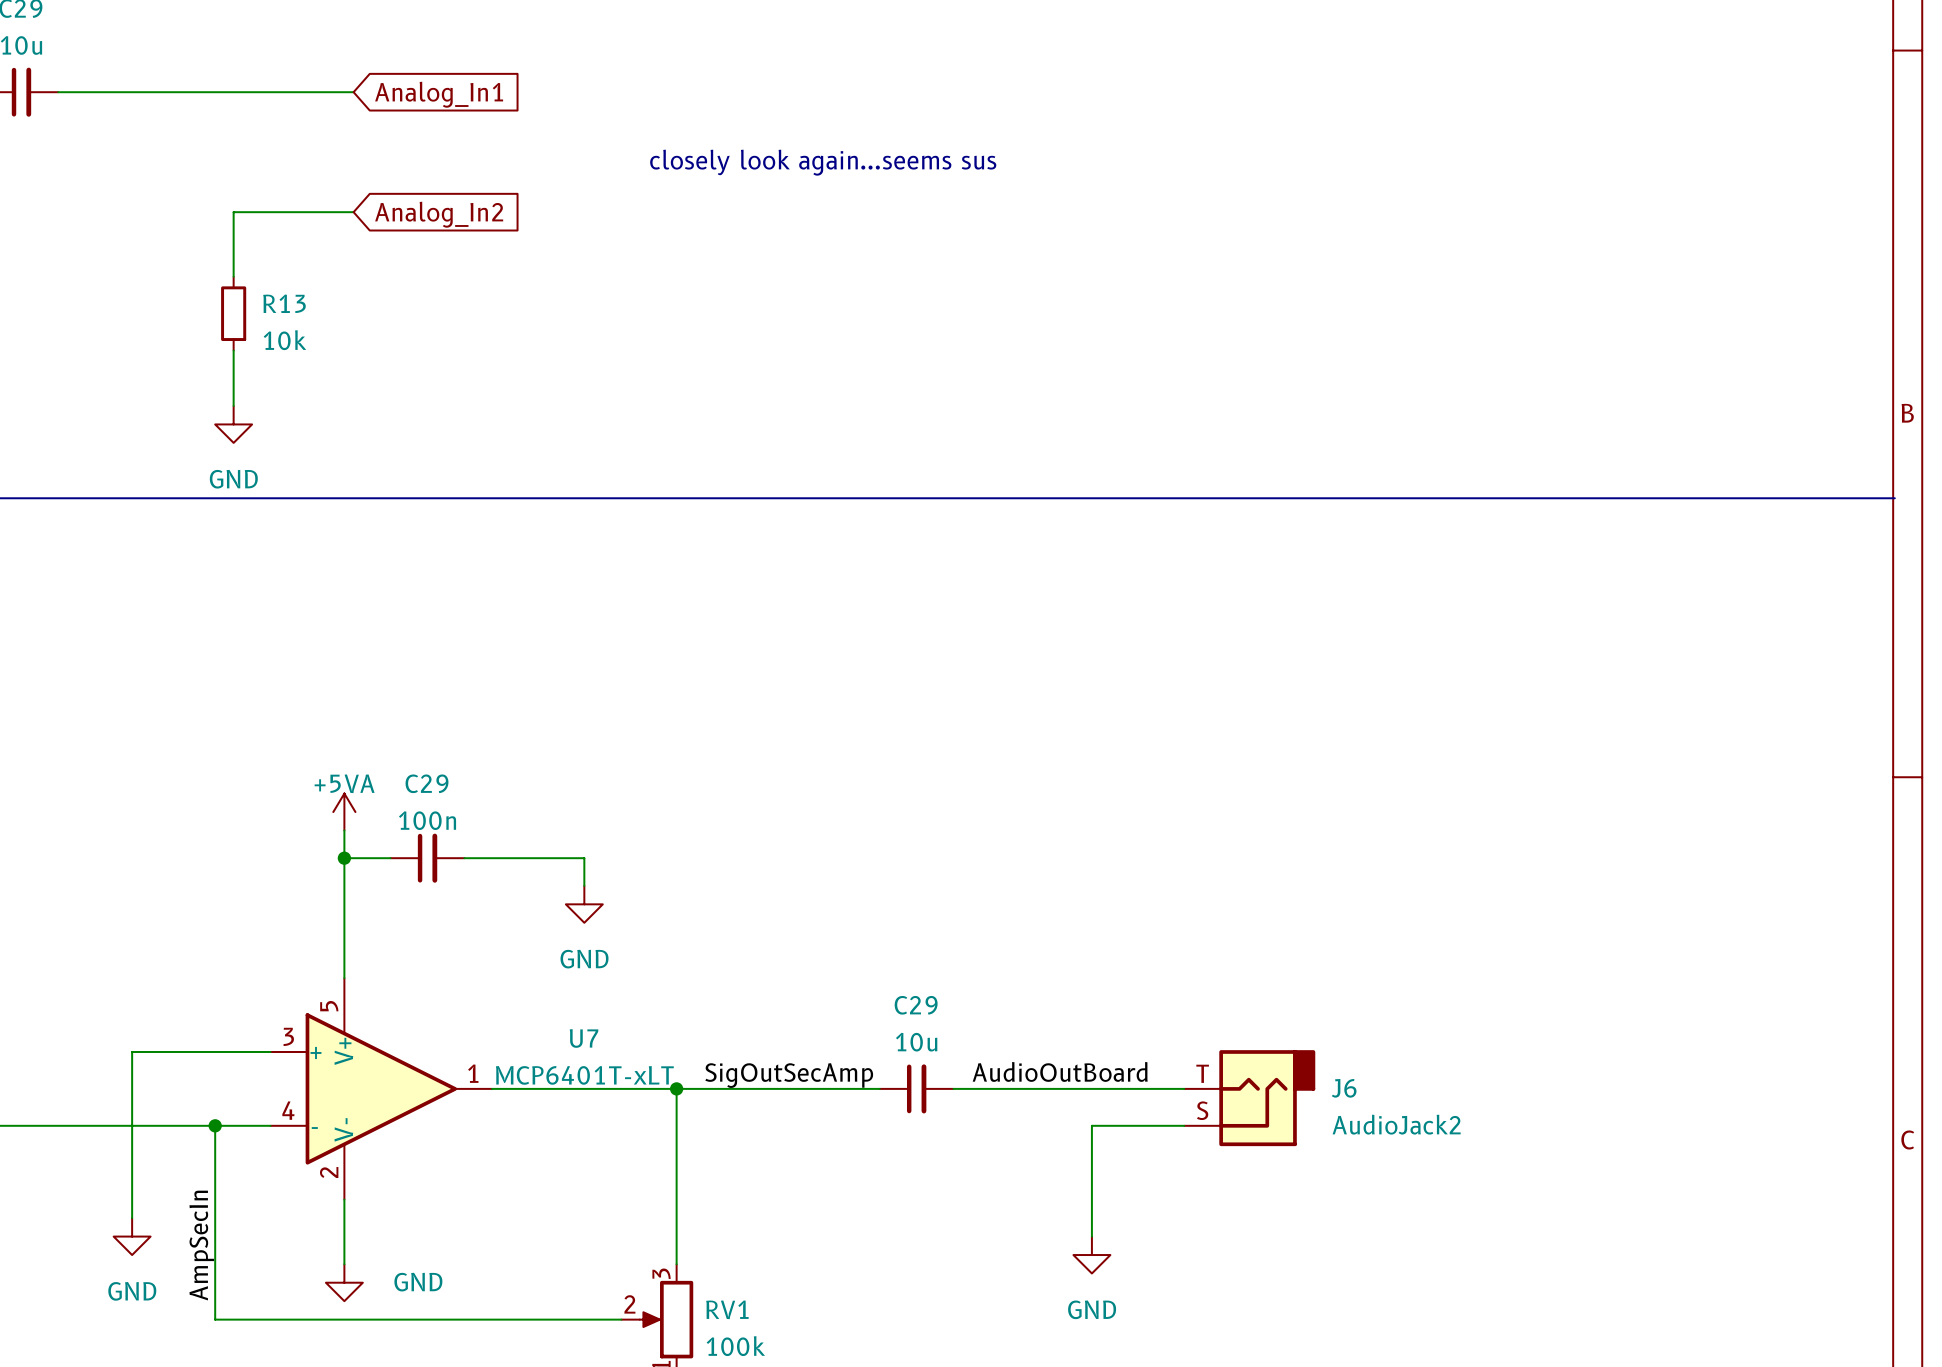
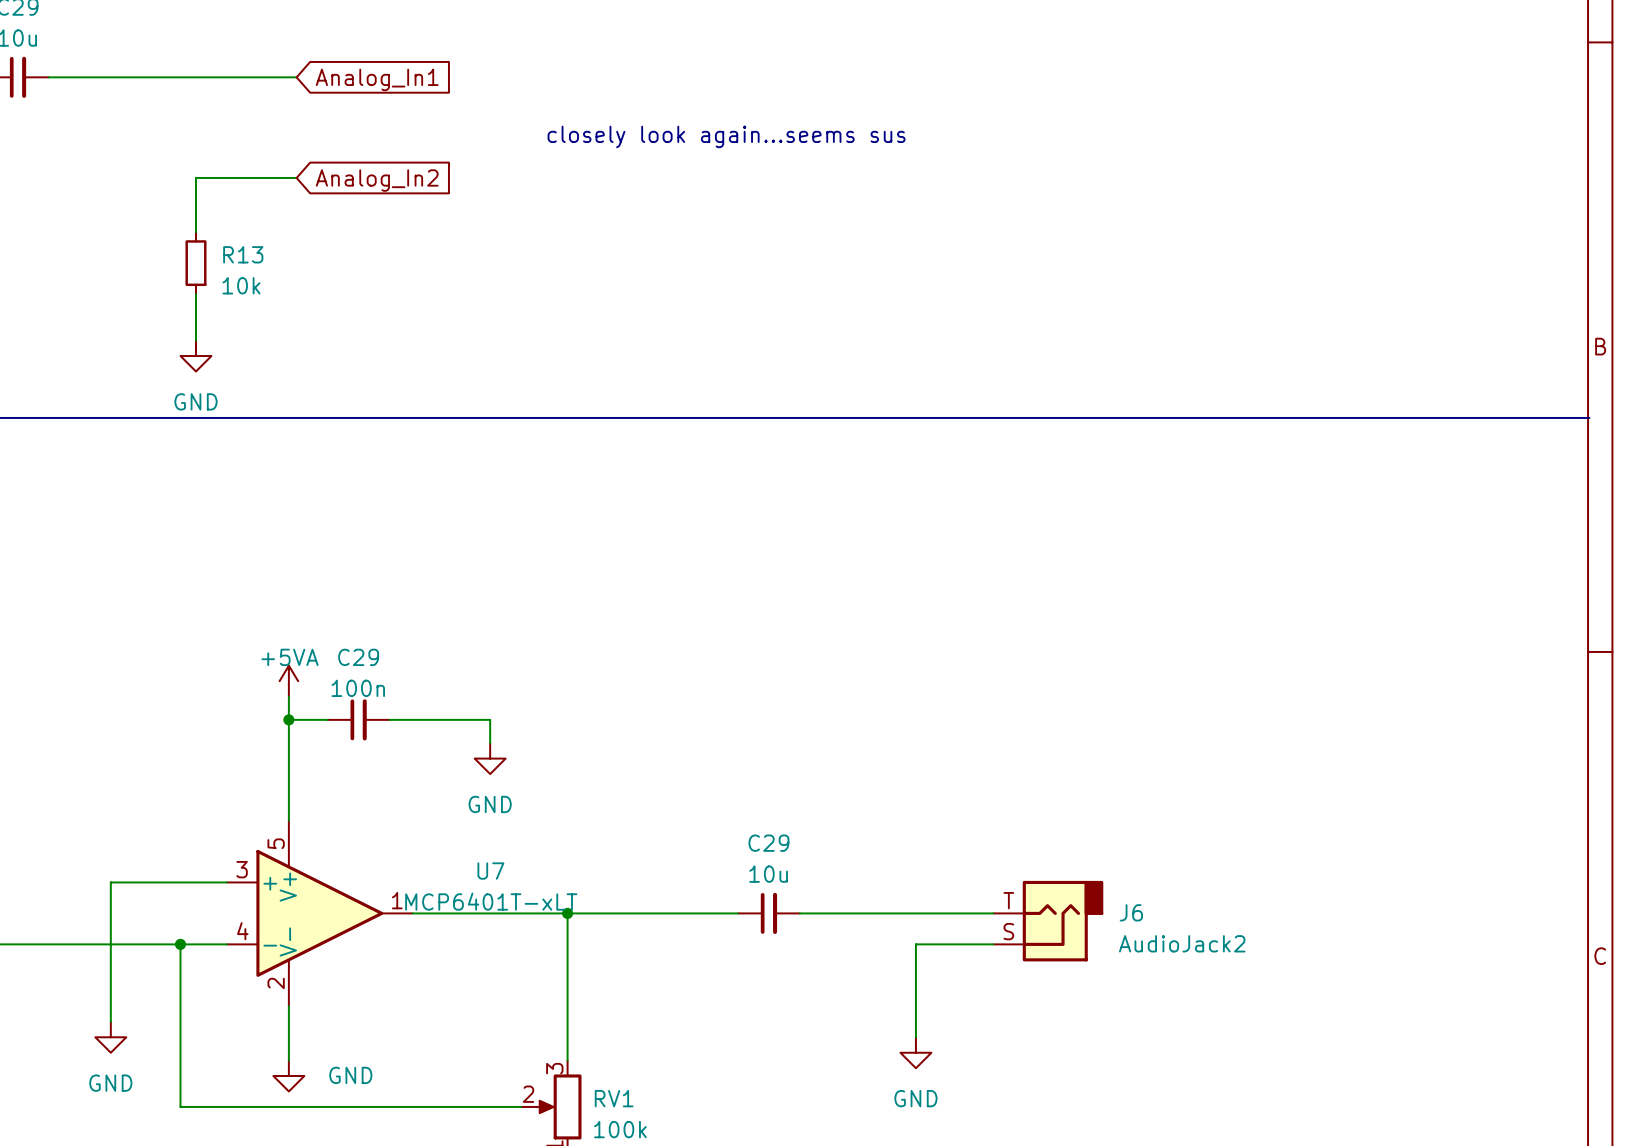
label: AudioOutBoard (1060, 1071) -> none
label: SigOutSecAmp (789, 1075) -> none
label: AmpSecIn (201, 1245) -> none

